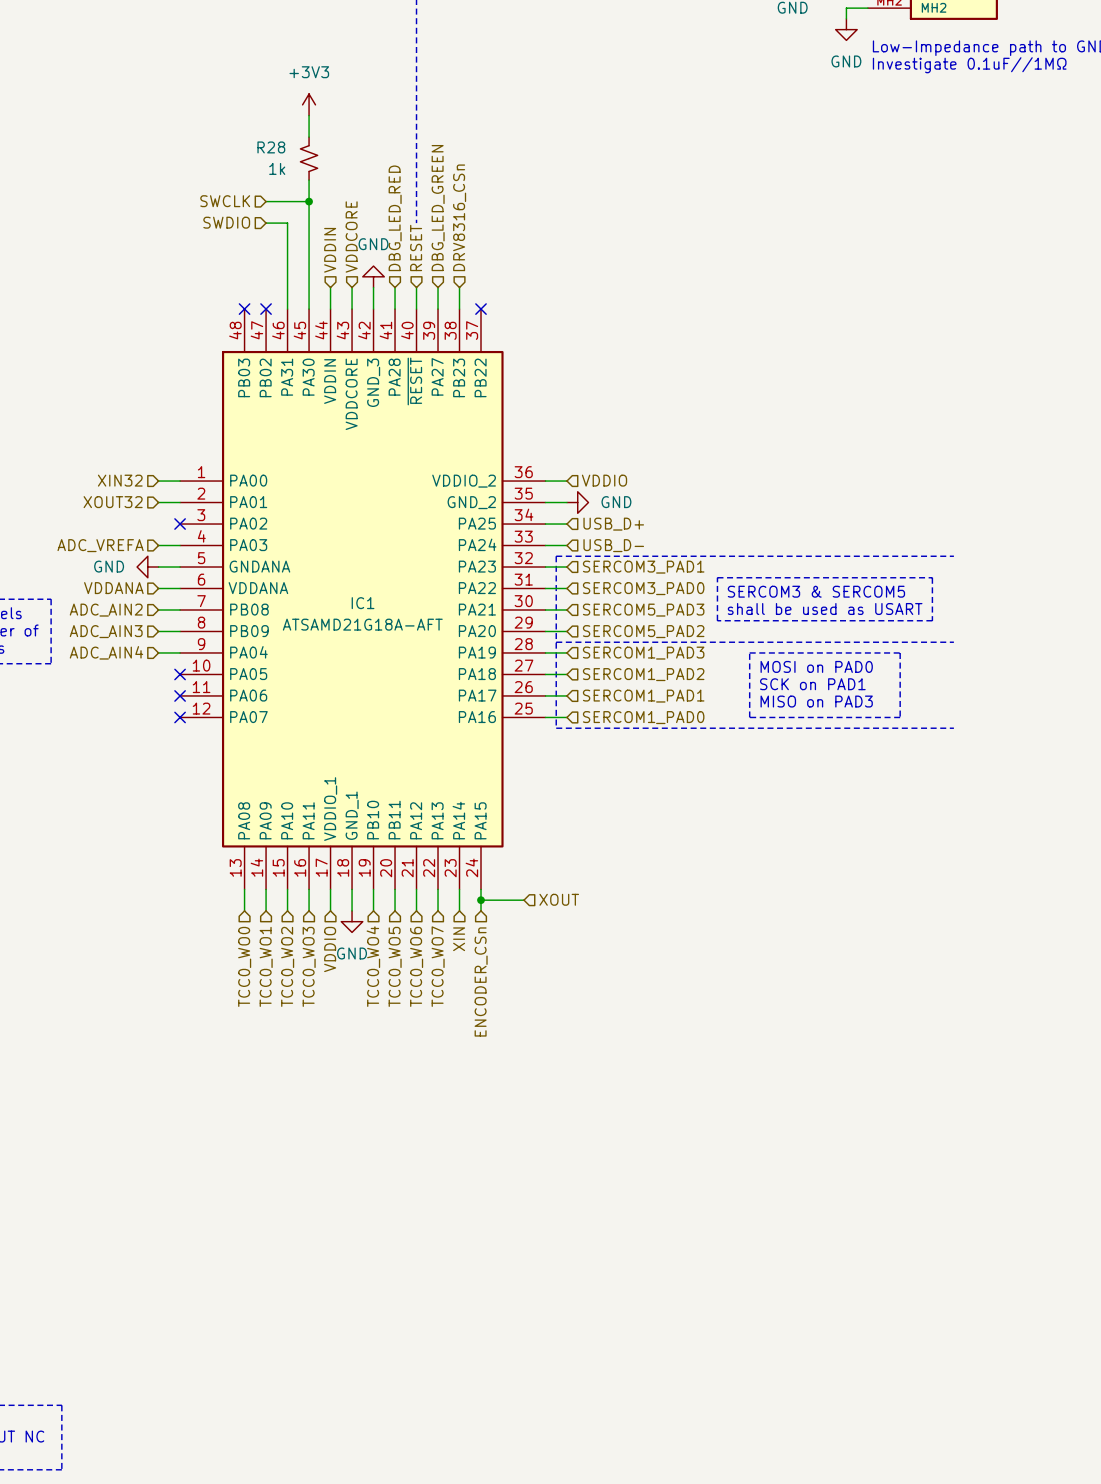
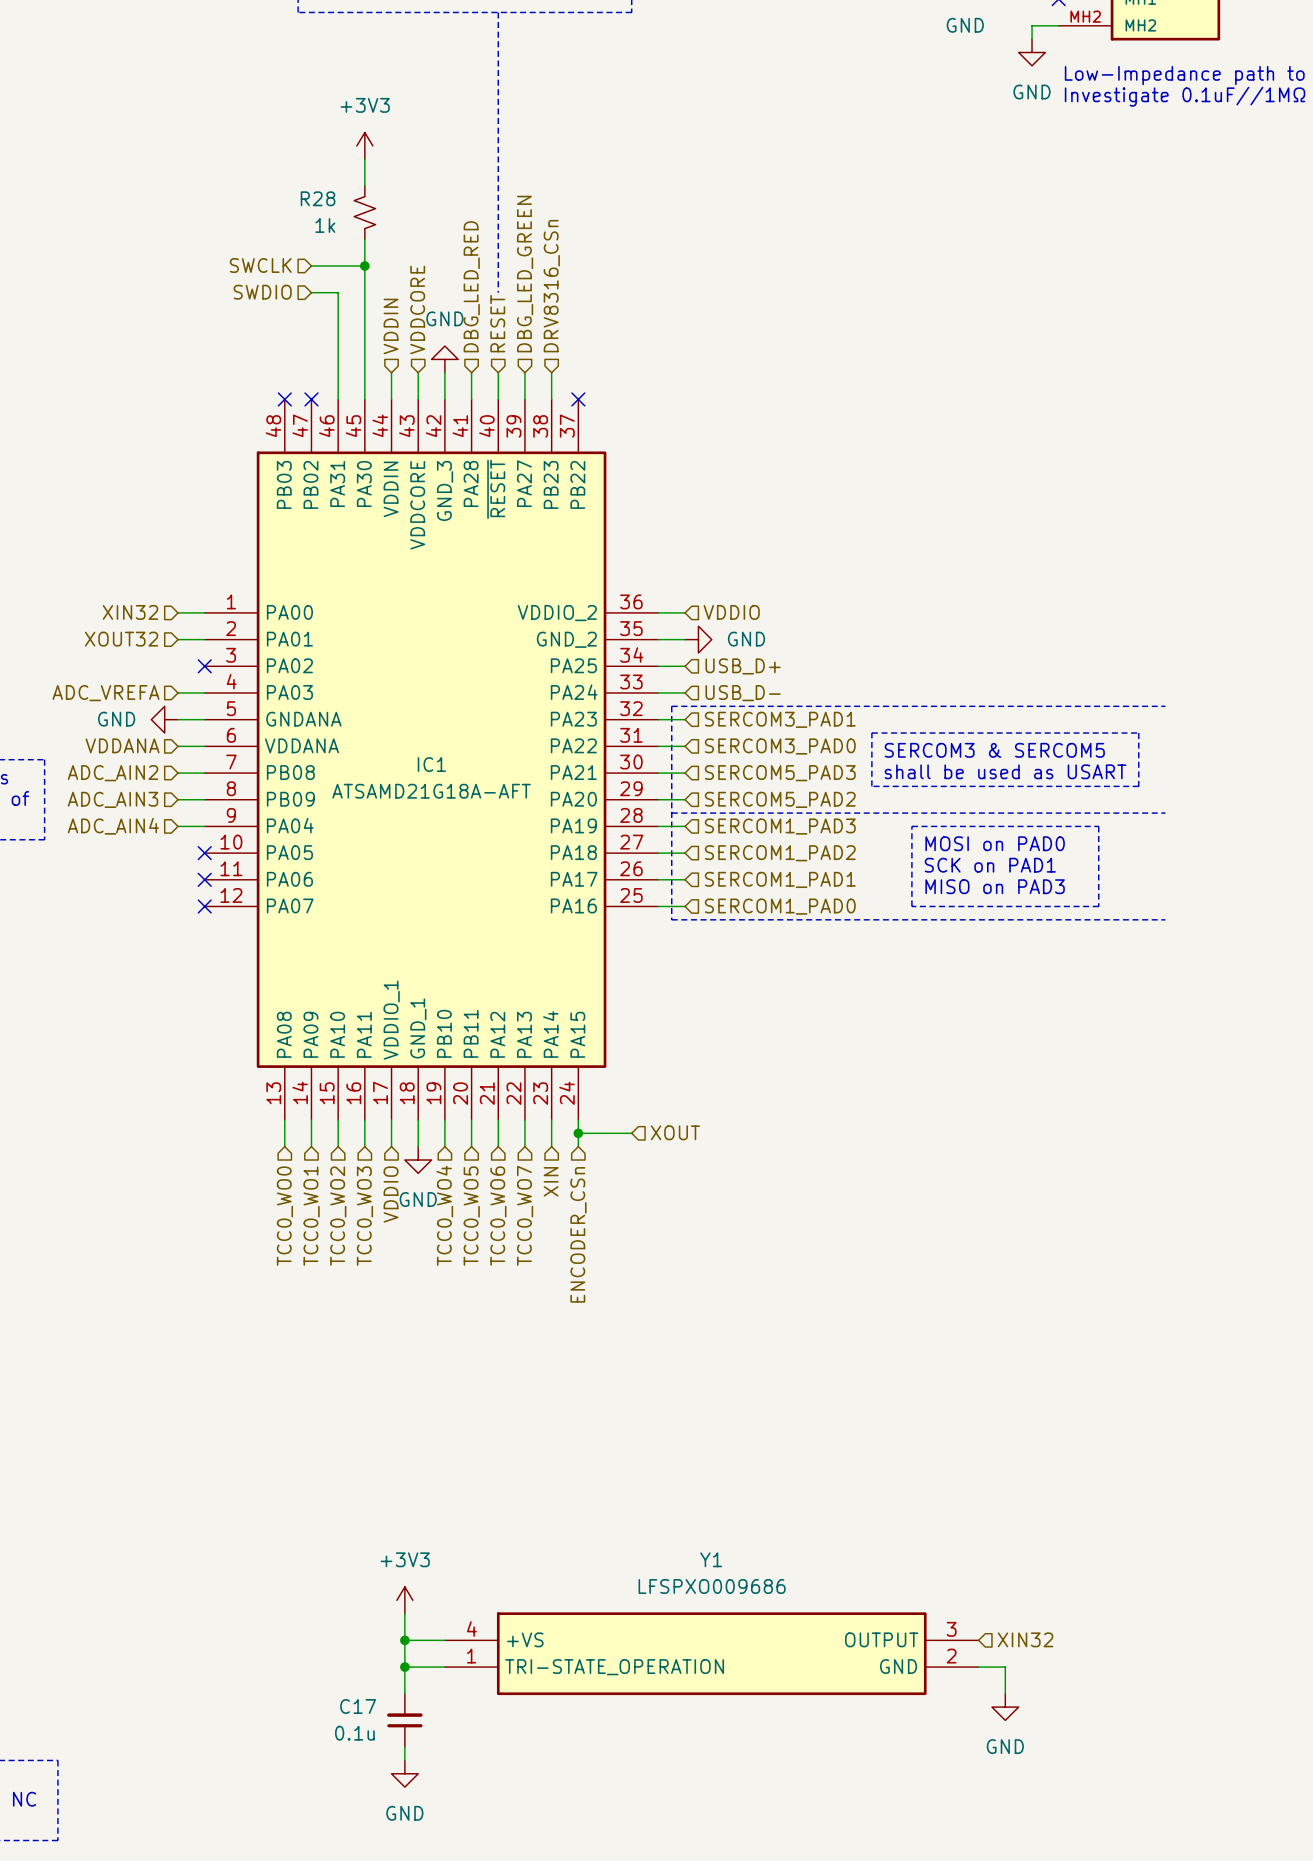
power symbol: none -> +3V3 (404, 1600)
wire: none -> (404, 1613) (404, 1693)
wire: none -> (404, 1640) (444, 1640)
junction: none -> (404, 1640)
hierarchical label: none -> XIN32 (1025, 1639)
Y1: none -> LFSPXO009686 (711, 1653)
wire: none -> (404, 1667) (444, 1667)
junction: none -> (404, 1667)
wire: none -> (978, 1667) (1005, 1667) (1005, 1693)
power symbol: none -> GND (1005, 1707)
C17: none -> 0.1u (404, 1720)
wire: none -> (404, 1747) (404, 1760)
power symbol: none -> GND (404, 1773)

